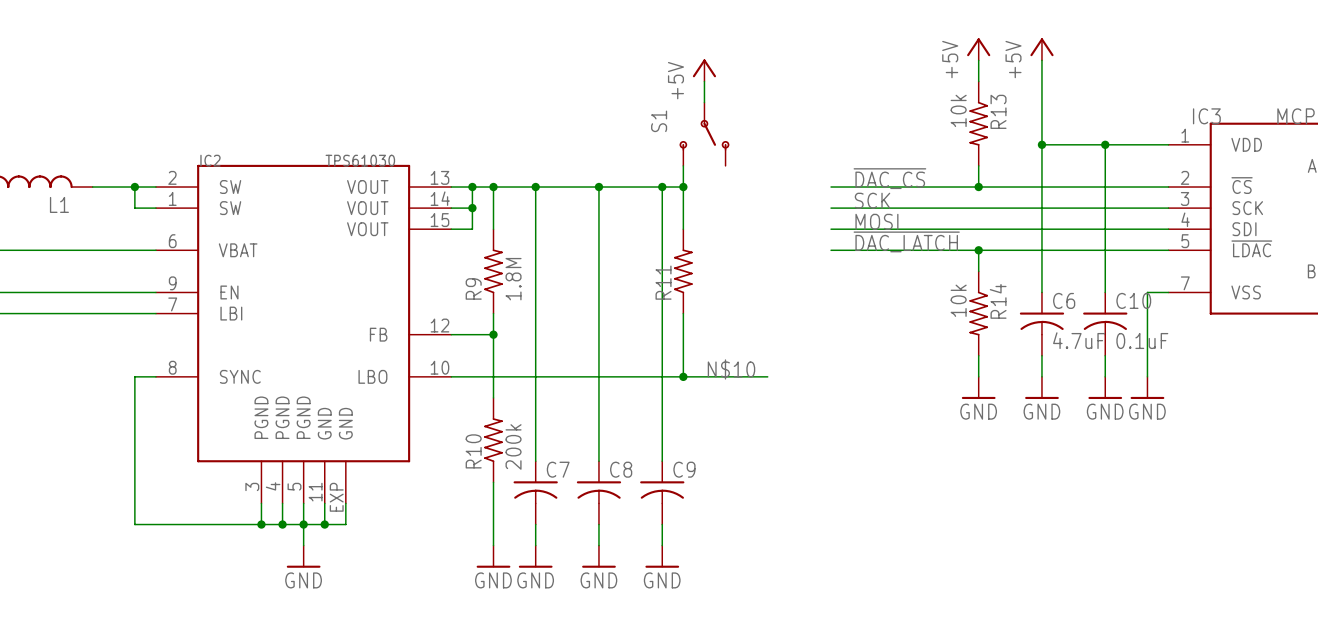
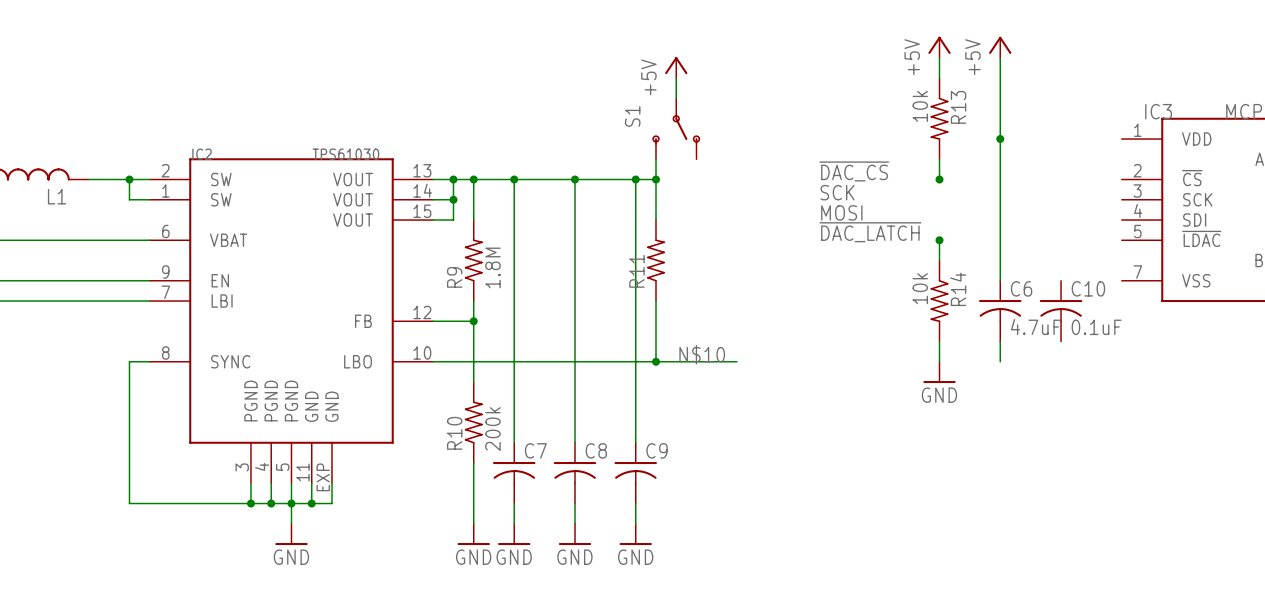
wire: (1041, 144) (1168, 144) -> none
wire: (1105, 144) (1105, 292) -> none
junction: (1105, 144) -> none
wire: (831, 187) (1168, 187) -> none
wire: (831, 208) (1168, 208) -> none
wire: (831, 229) (1168, 229) -> none
wire: (831, 250) (1168, 250) -> none
wire: (1168, 292) (1147, 292) (1147, 376) -> none
wire: (1105, 355) (1105, 376) -> none
power symbol: GND (1041, 387) -> none
power symbol: GND (1105, 387) -> none
power symbol: GND (1147, 387) -> none

